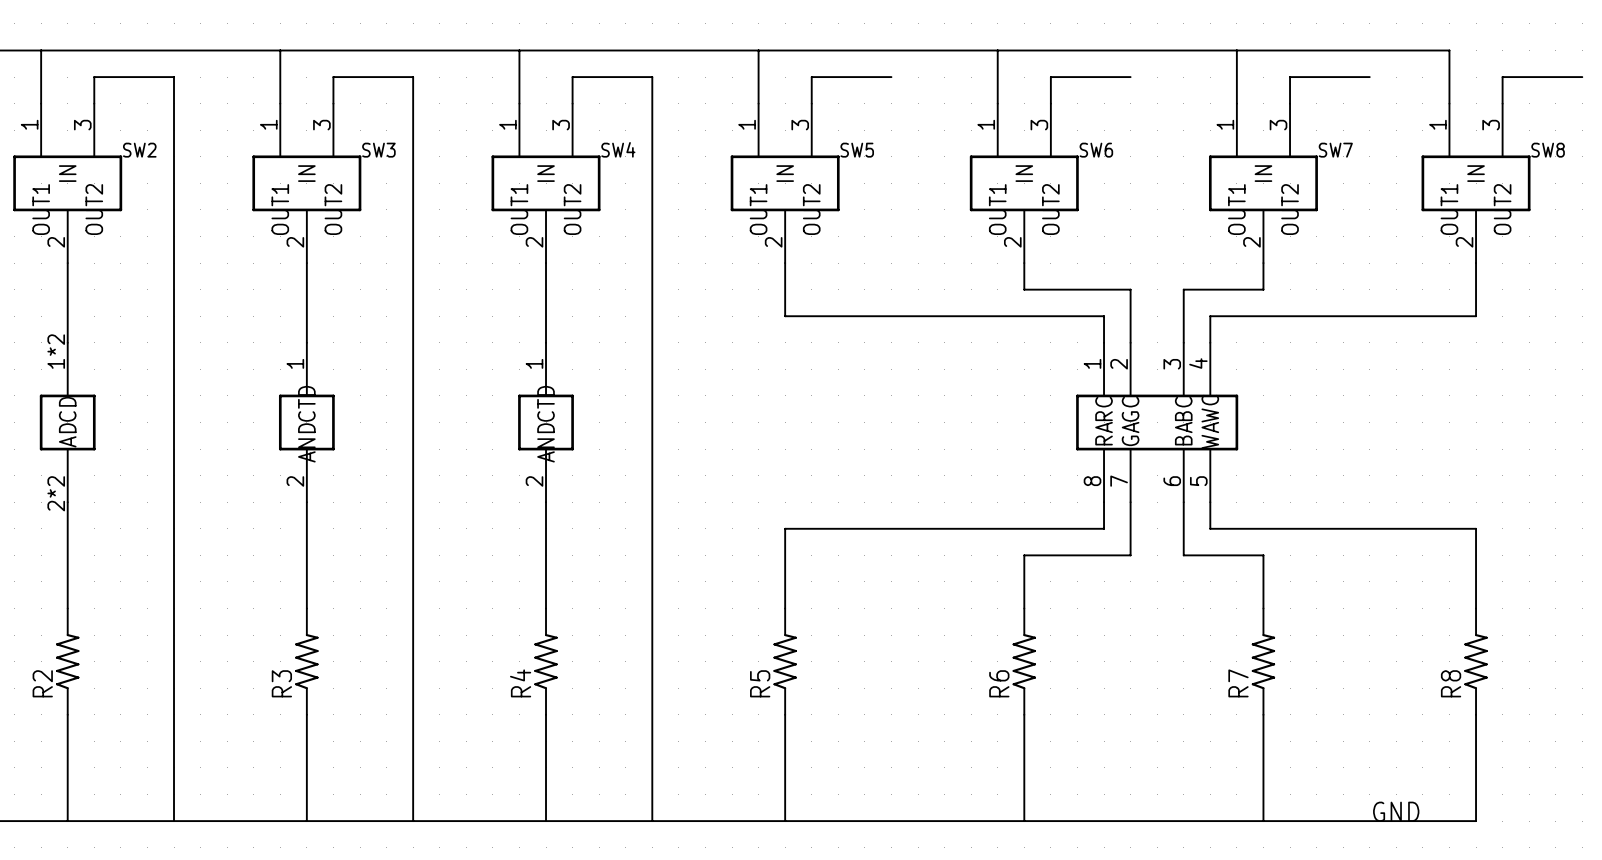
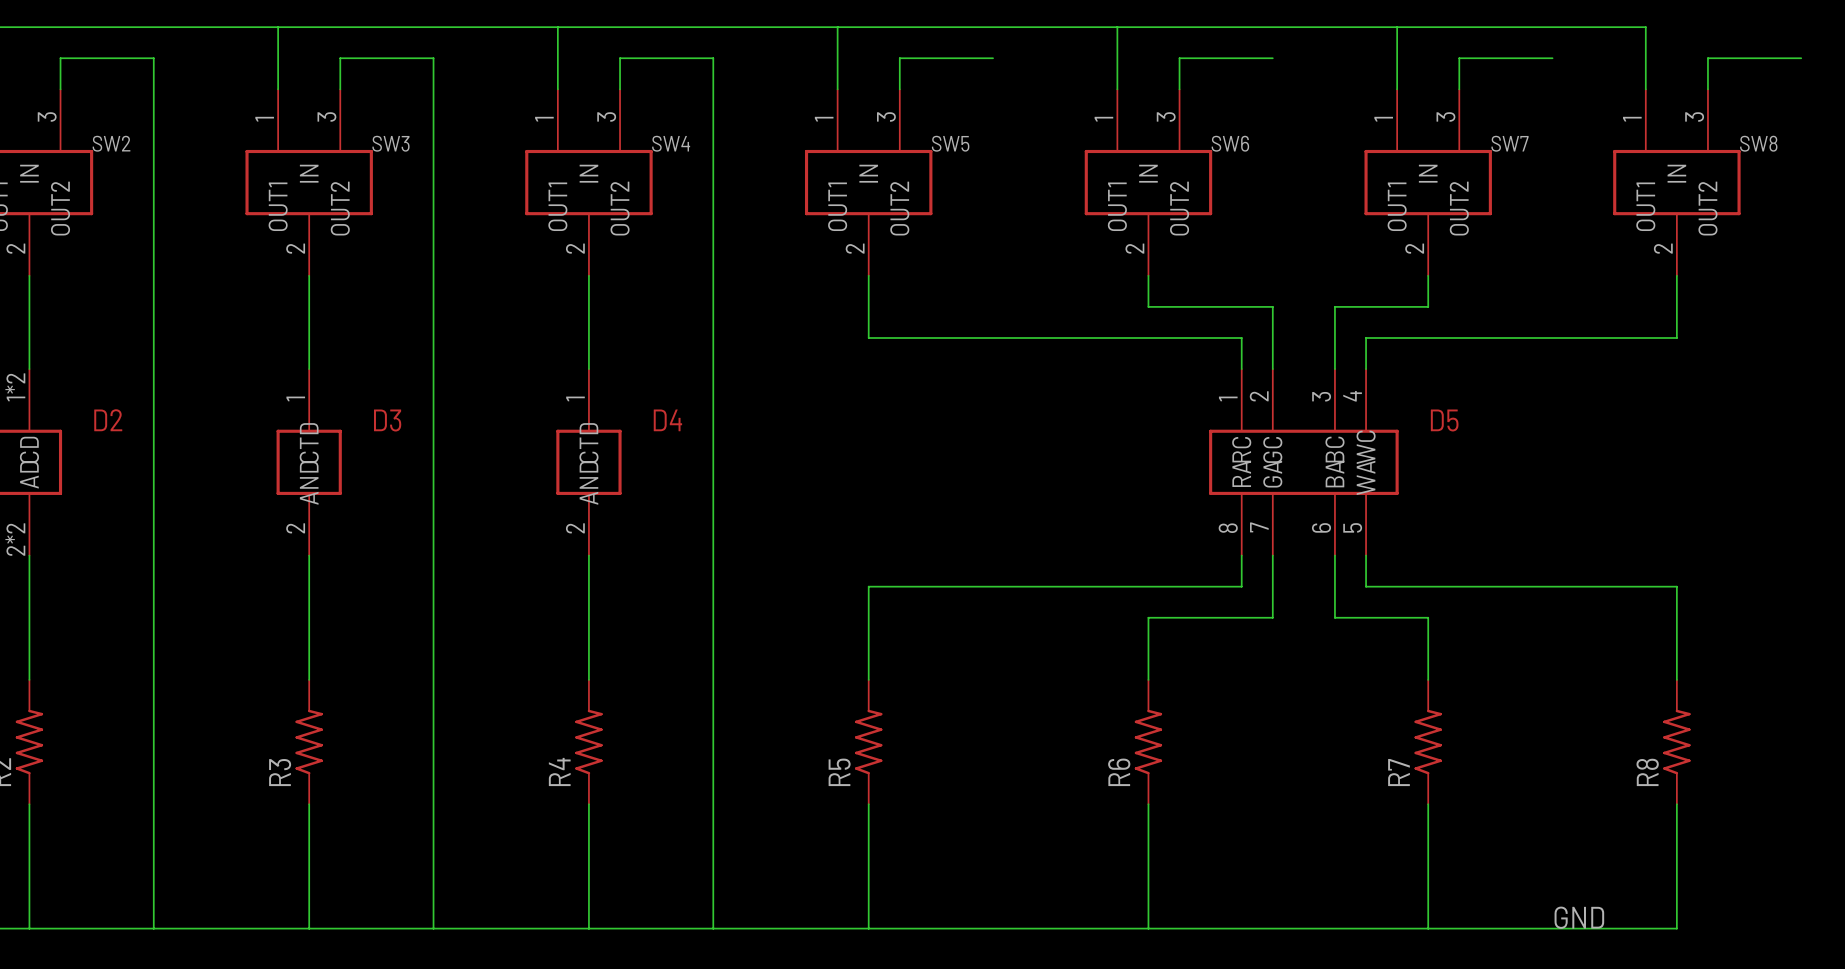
D2 name: none -> D2 (108, 420)
D3 name: none -> D3 (387, 420)
D4 name: none -> D4 (667, 420)
D5 name: none -> D5 (1444, 420)

